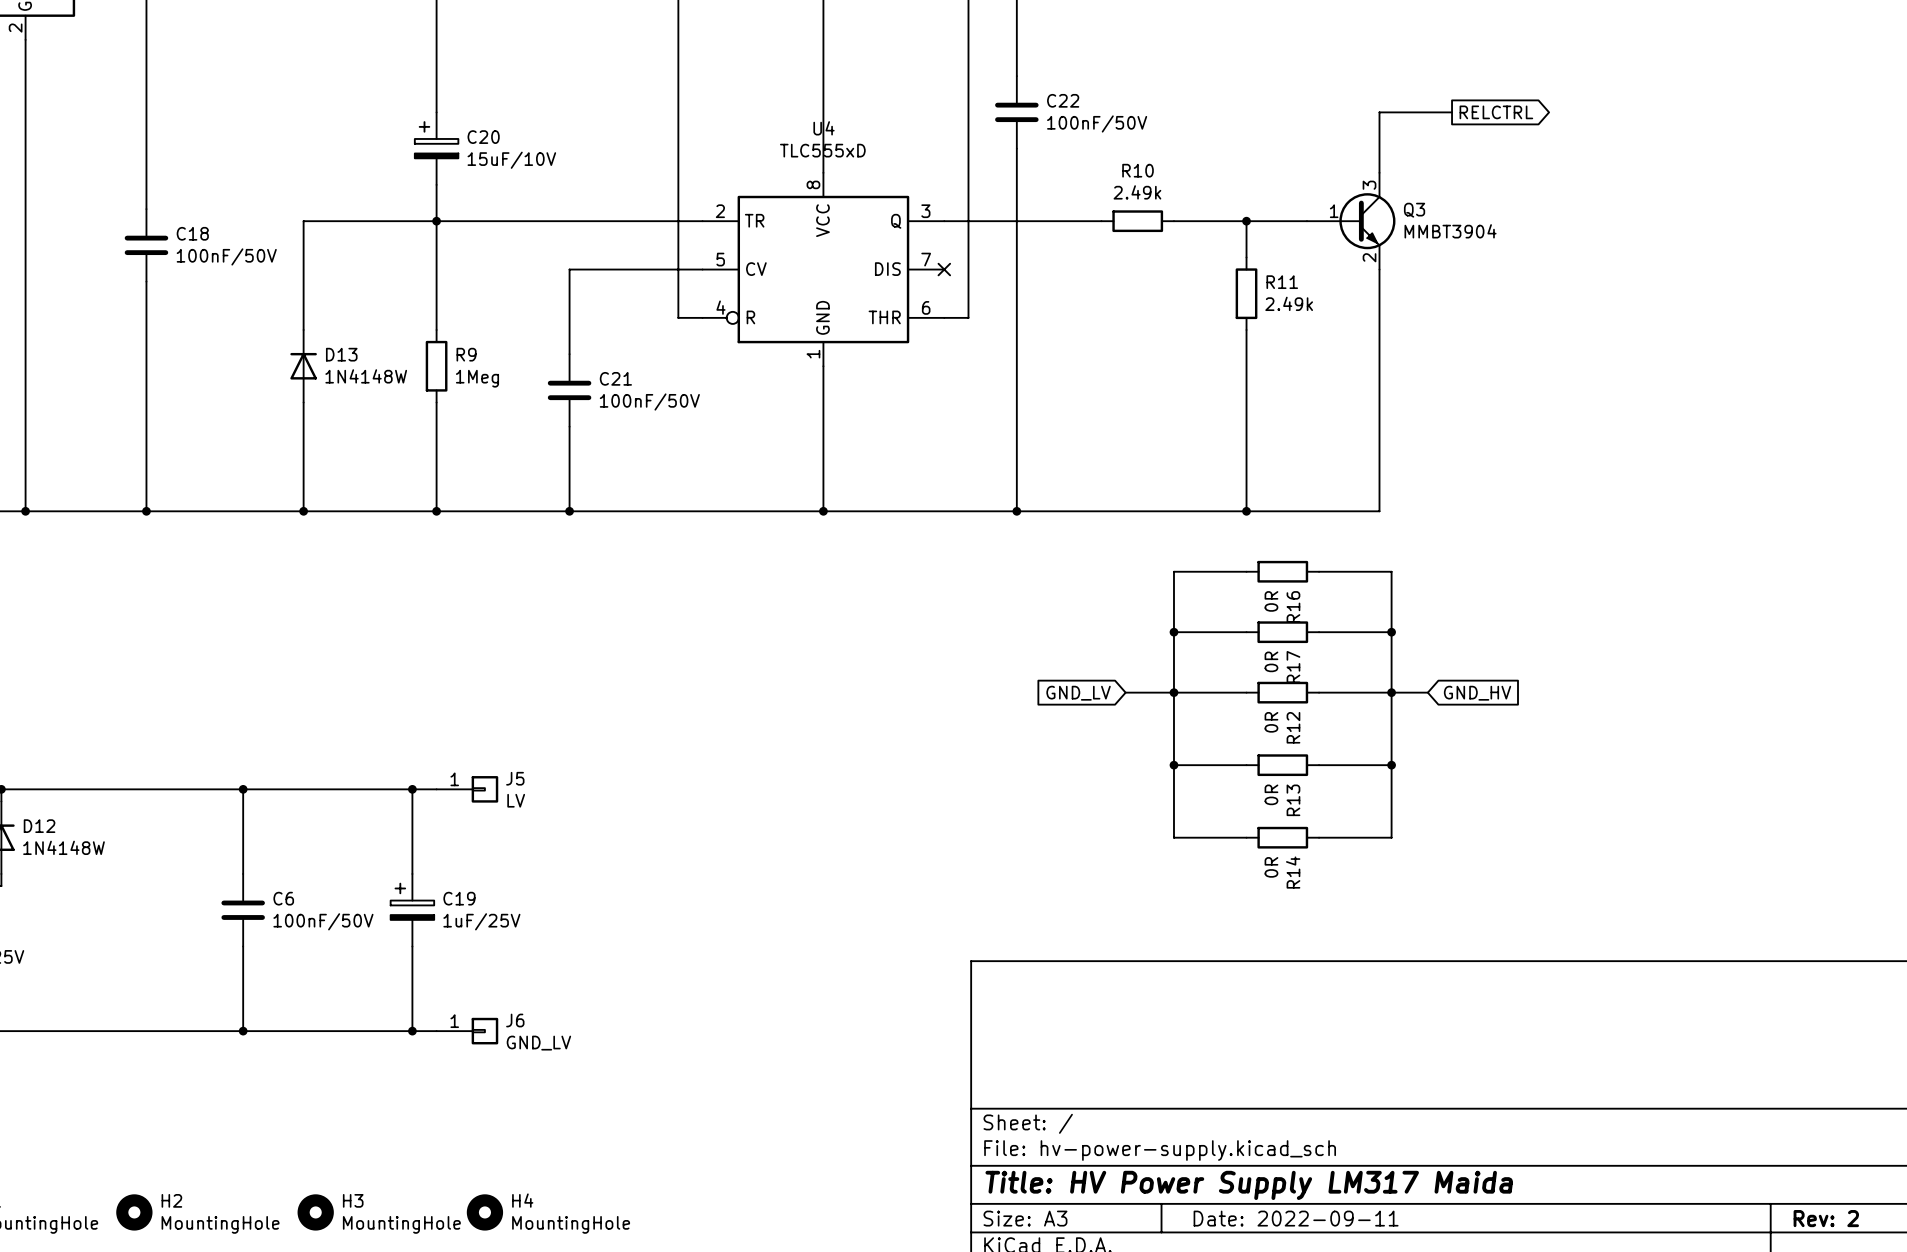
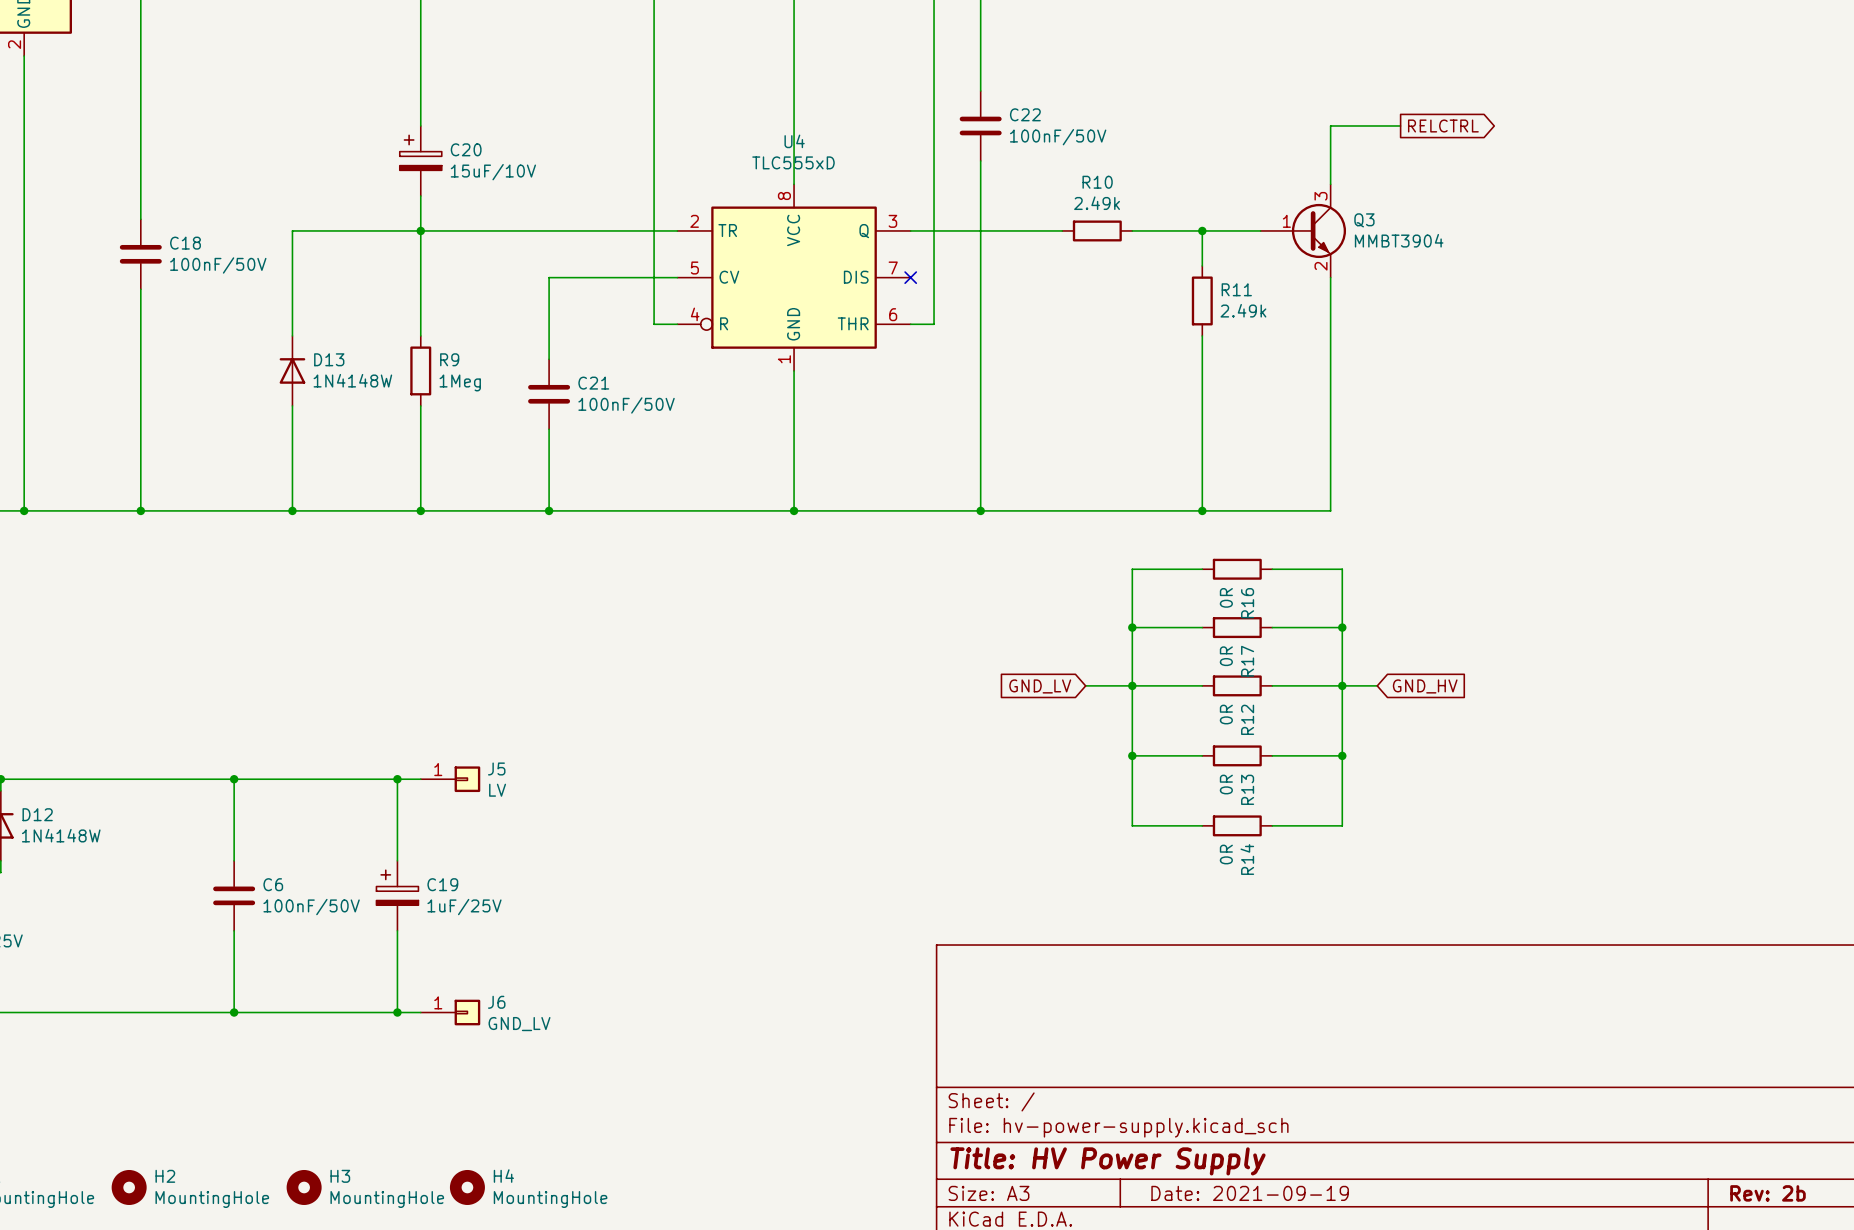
title block: Title: HV Power Supply LM317 Maida (1249, 1185) -> Title: HV Power Supply (1108, 1161)
title block: Date: 2022-09-11 (1296, 1218) -> Date: 2021-09-19 (1250, 1193)
title block: Rev: 2 (1826, 1218) -> Rev: 2b (1767, 1193)

